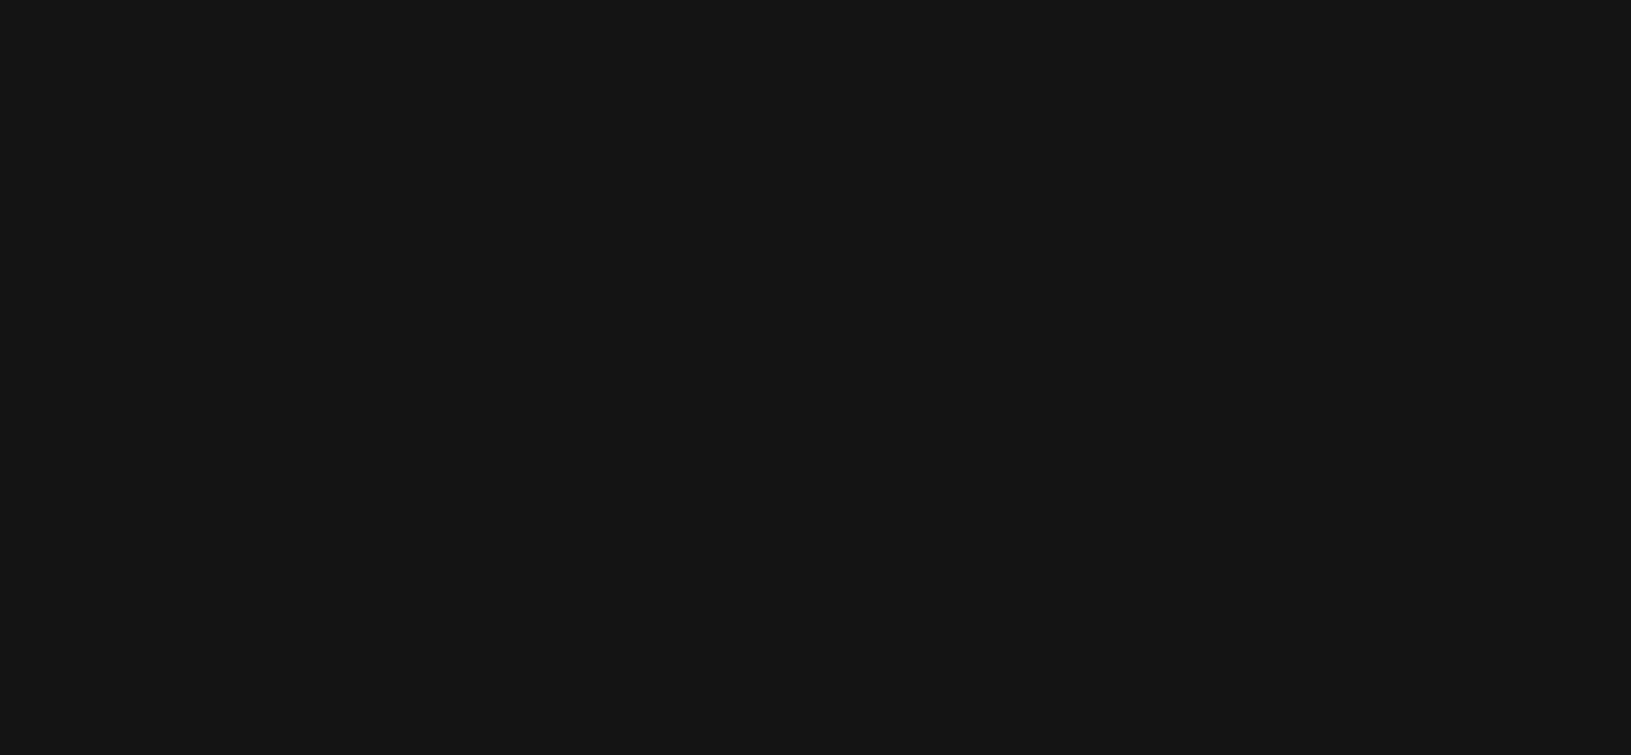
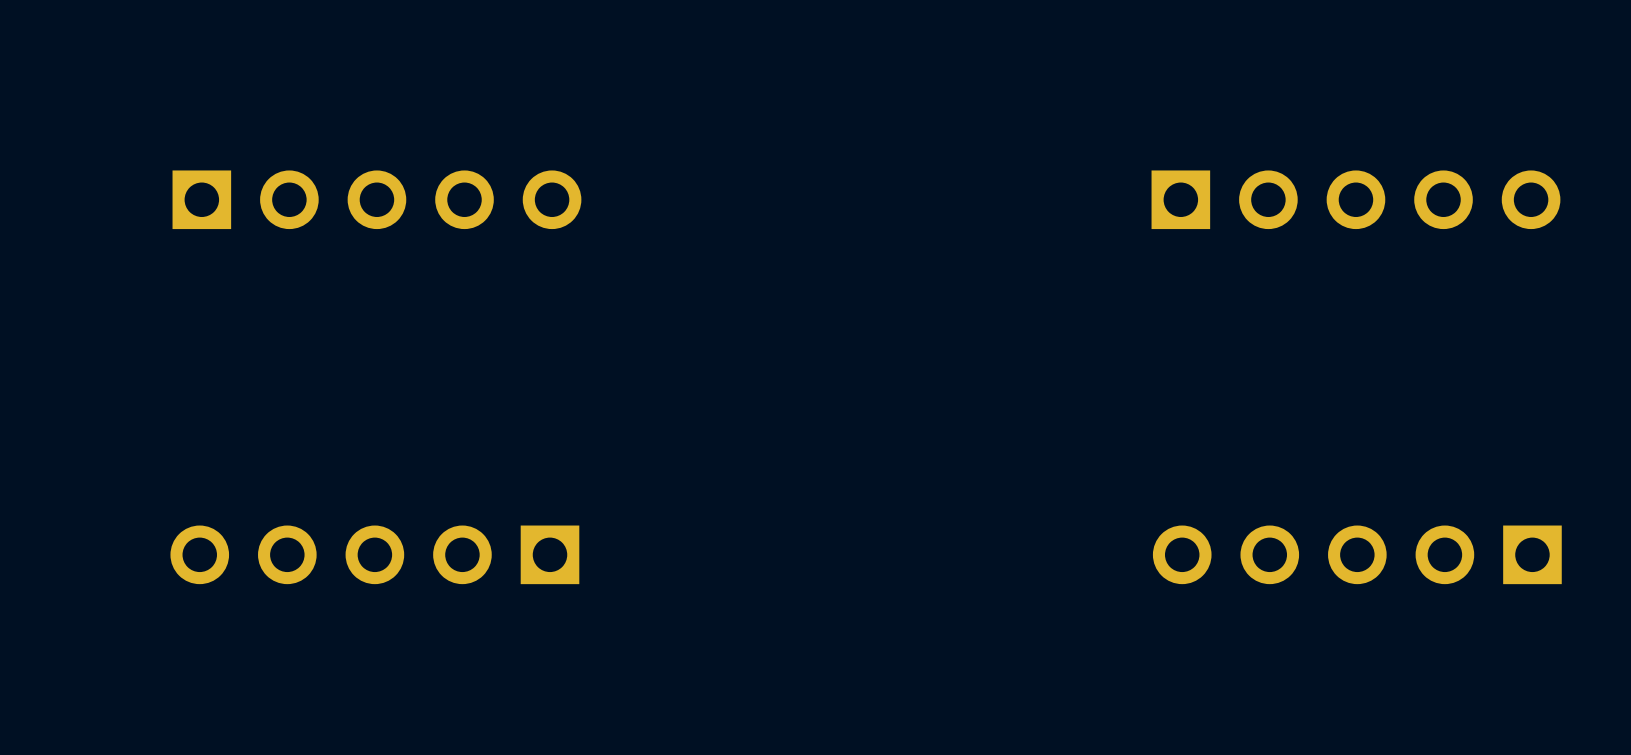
part: none -> (376, 199)
part: none -> (1355, 199)
part: none -> (374, 554)
part: none -> (1357, 554)

